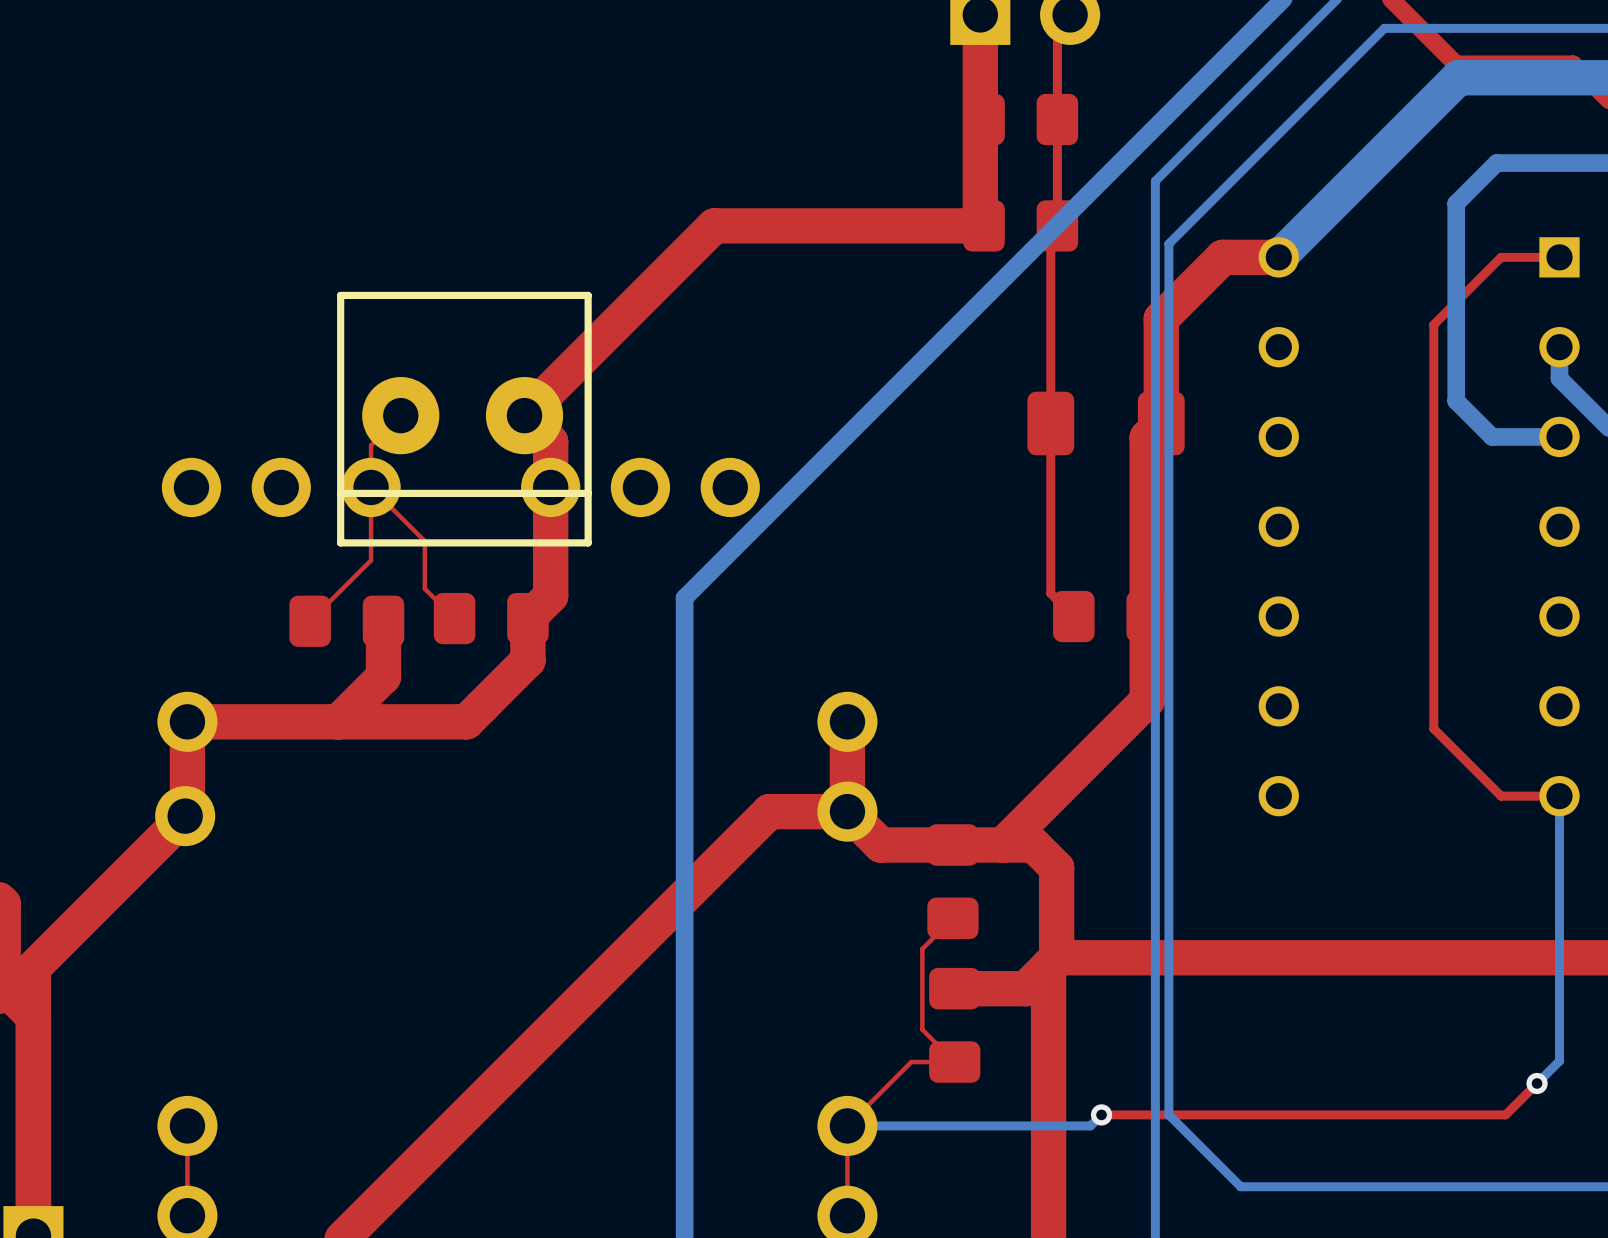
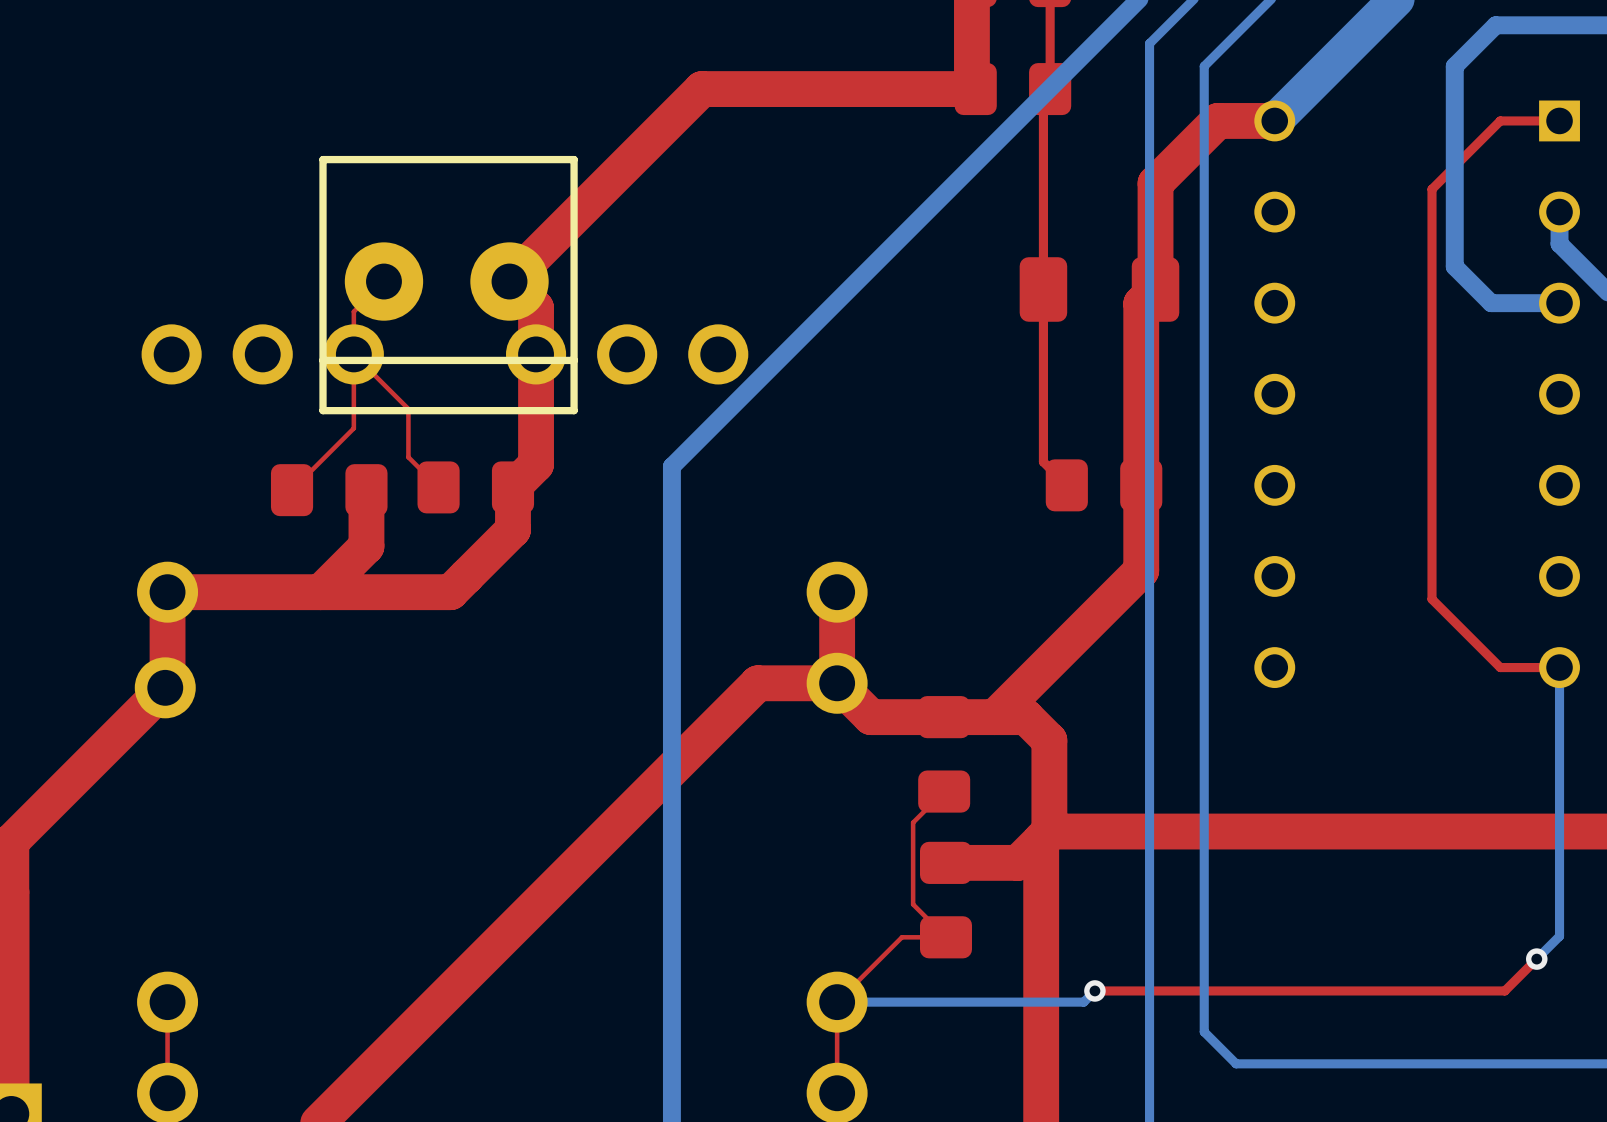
bottom track: (1209, 203) (1168, 243) (1168, 1114) (1209, 1155) -> (1204, 66) (1204, 1031)

